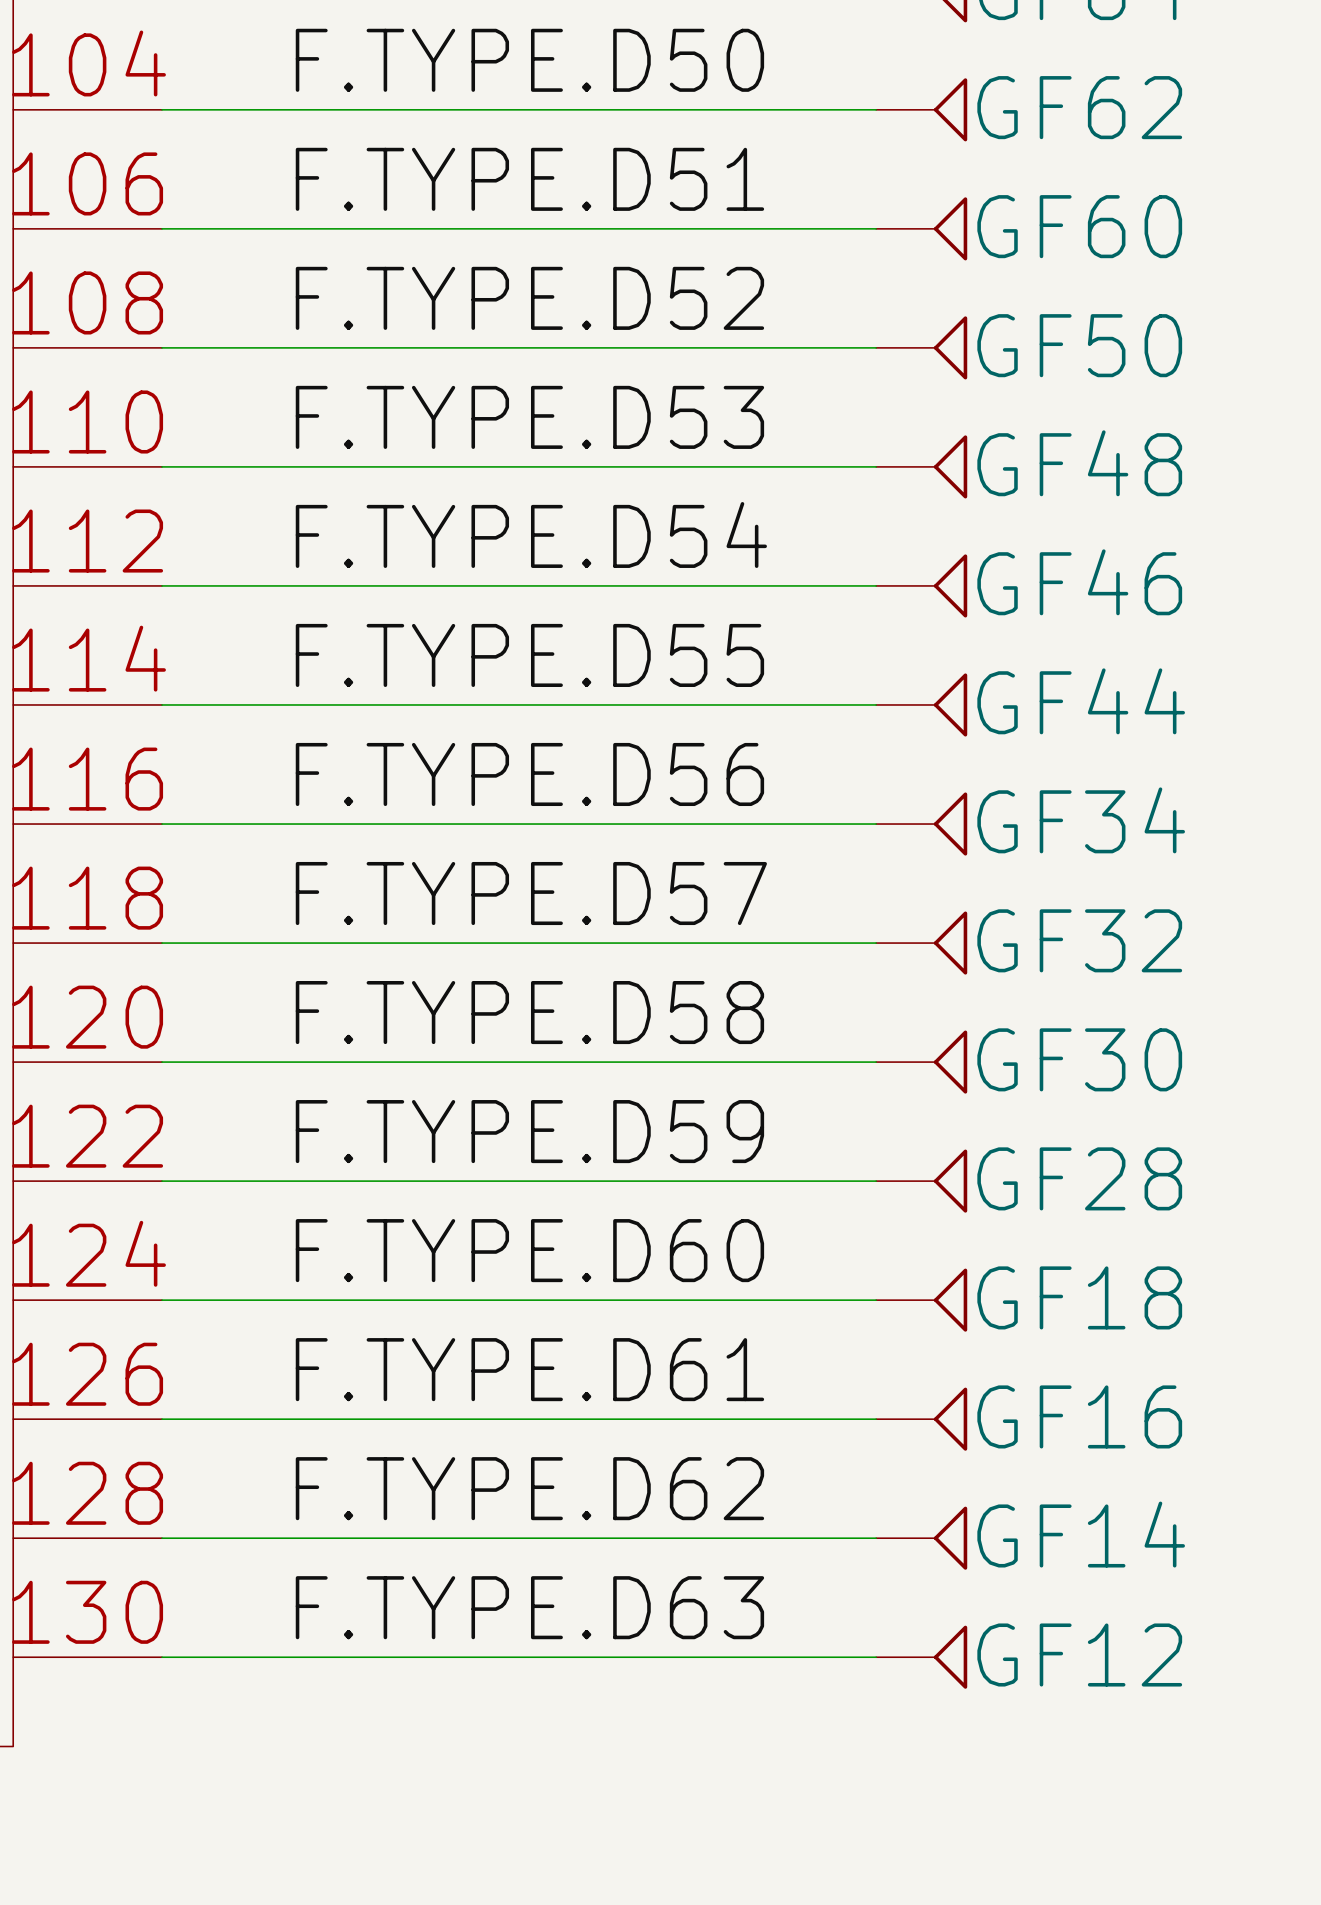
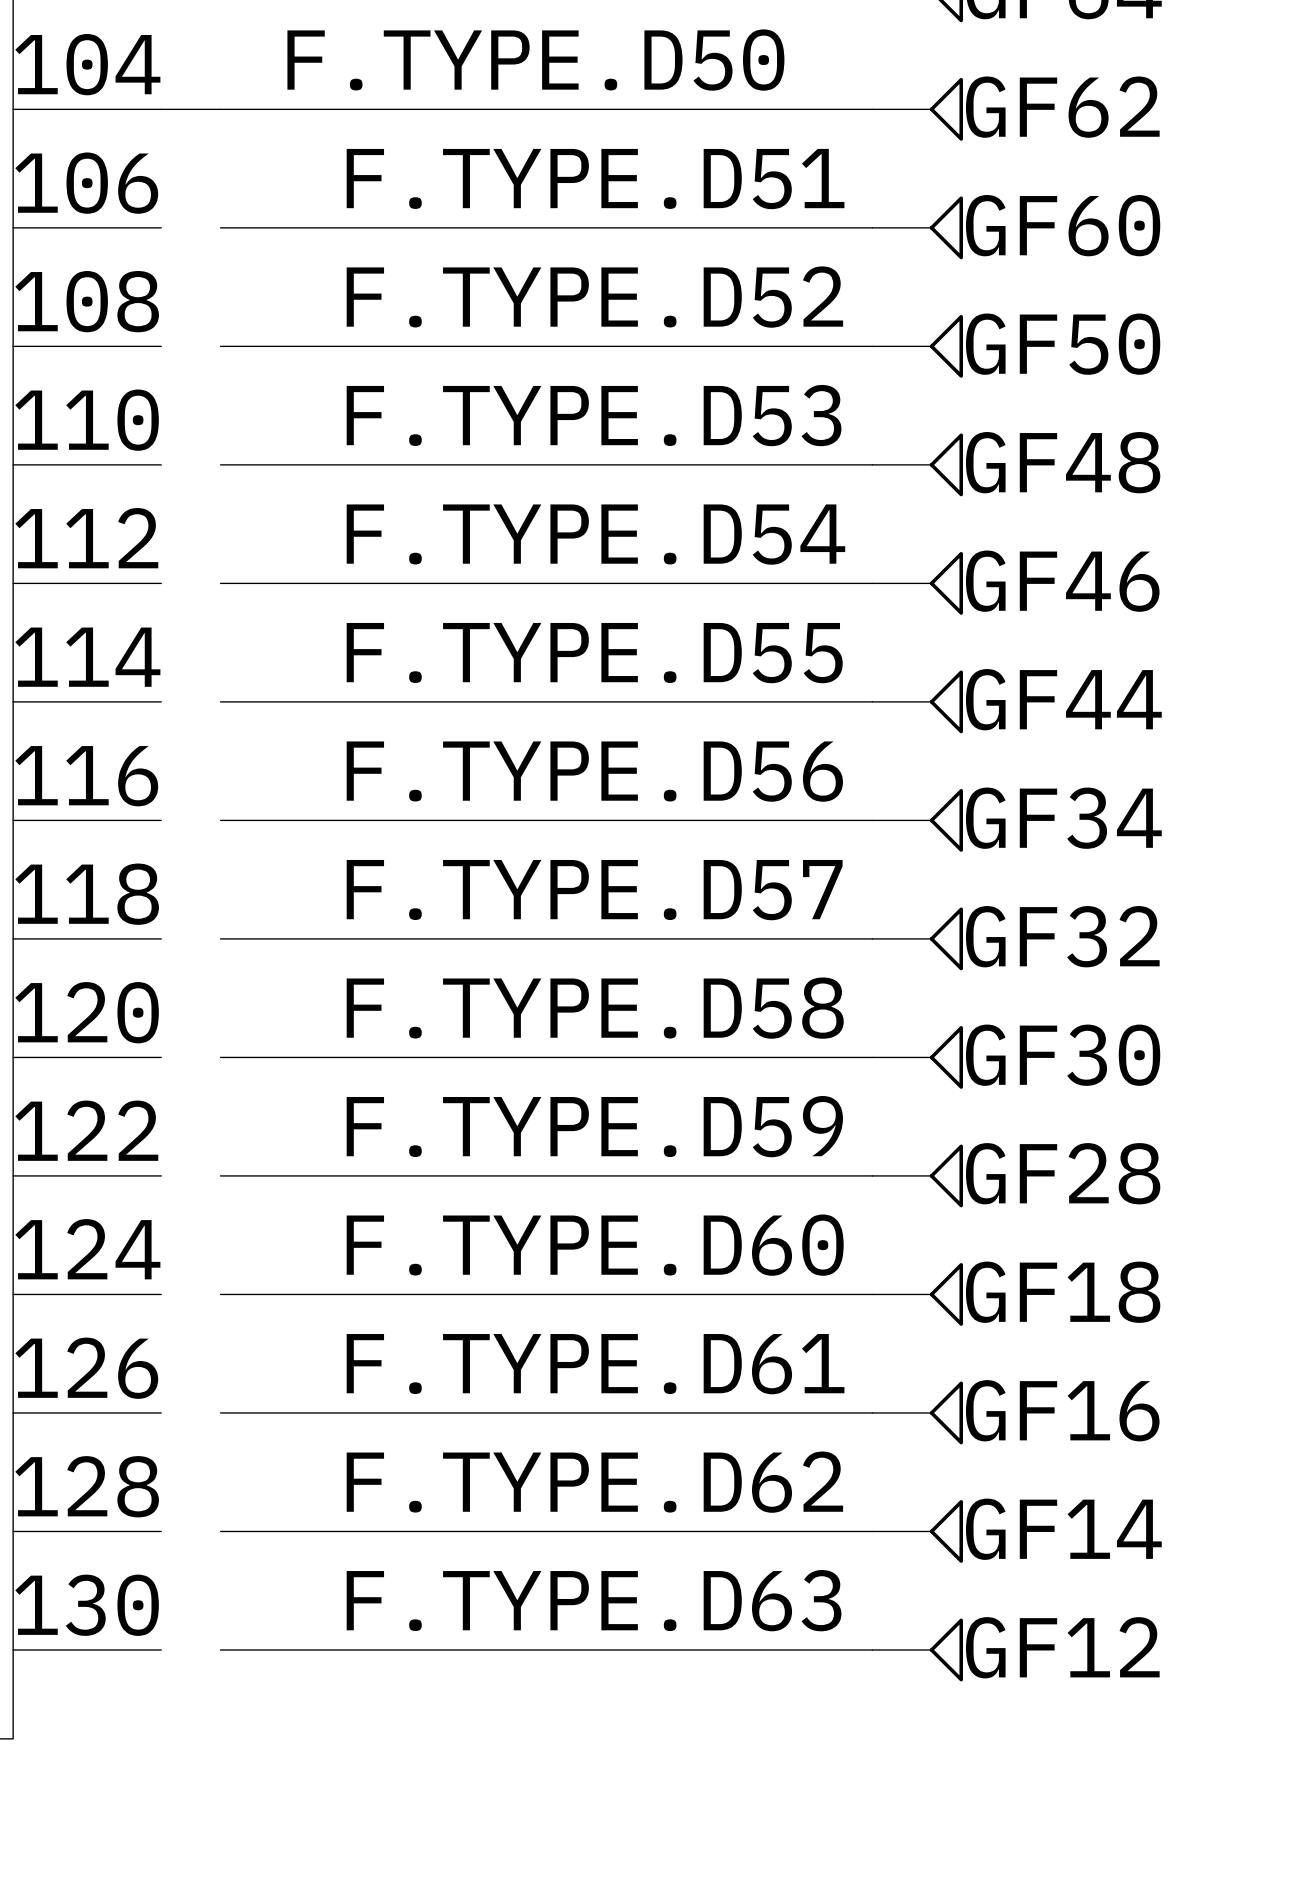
label position: F.TYPE.D51 (529, 179) -> F.TYPE.D51 (595, 179)
wire: (161, 228) (221, 228) -> none
label position: F.TYPE.D52 (529, 298) -> F.TYPE.D52 (594, 297)
wire: (161, 347) (221, 347) -> none
label position: F.TYPE.D53 (529, 417) -> F.TYPE.D53 (594, 415)
wire: (161, 466) (221, 466) -> none
label position: F.TYPE.D54 (531, 535) -> F.TYPE.D54 (595, 534)
wire: (161, 585) (221, 585) -> none
label position: F.TYPE.D55 (529, 655) -> F.TYPE.D55 (594, 653)
wire: (161, 704) (221, 704) -> none
label position: F.TYPE.D56 (529, 774) -> F.TYPE.D56 (594, 771)
wire: (161, 824) (221, 824) -> none
label position: F.TYPE.D57 (531, 893) -> F.TYPE.D57 (594, 890)
wire: (161, 943) (221, 943) -> none
label position: F.TYPE.D58 (529, 1012) -> F.TYPE.D58 (595, 1008)
wire: (161, 1062) (221, 1062) -> none
label position: F.TYPE.D59 (529, 1131) -> F.TYPE.D59 (594, 1126)
wire: (161, 1181) (221, 1181) -> none
label position: F.TYPE.D60 (529, 1250) -> F.TYPE.D60 (595, 1245)
wire: (161, 1300) (221, 1300) -> none
label position: F.TYPE.D61 (529, 1369) -> F.TYPE.D61 (595, 1364)
wire: (161, 1419) (221, 1419) -> none
label position: F.TYPE.D62 (529, 1488) -> F.TYPE.D62 (594, 1482)
wire: (161, 1538) (221, 1538) -> none
label position: F.TYPE.D63 (529, 1607) -> F.TYPE.D63 (594, 1600)
wire: (161, 1657) (221, 1657) -> none

